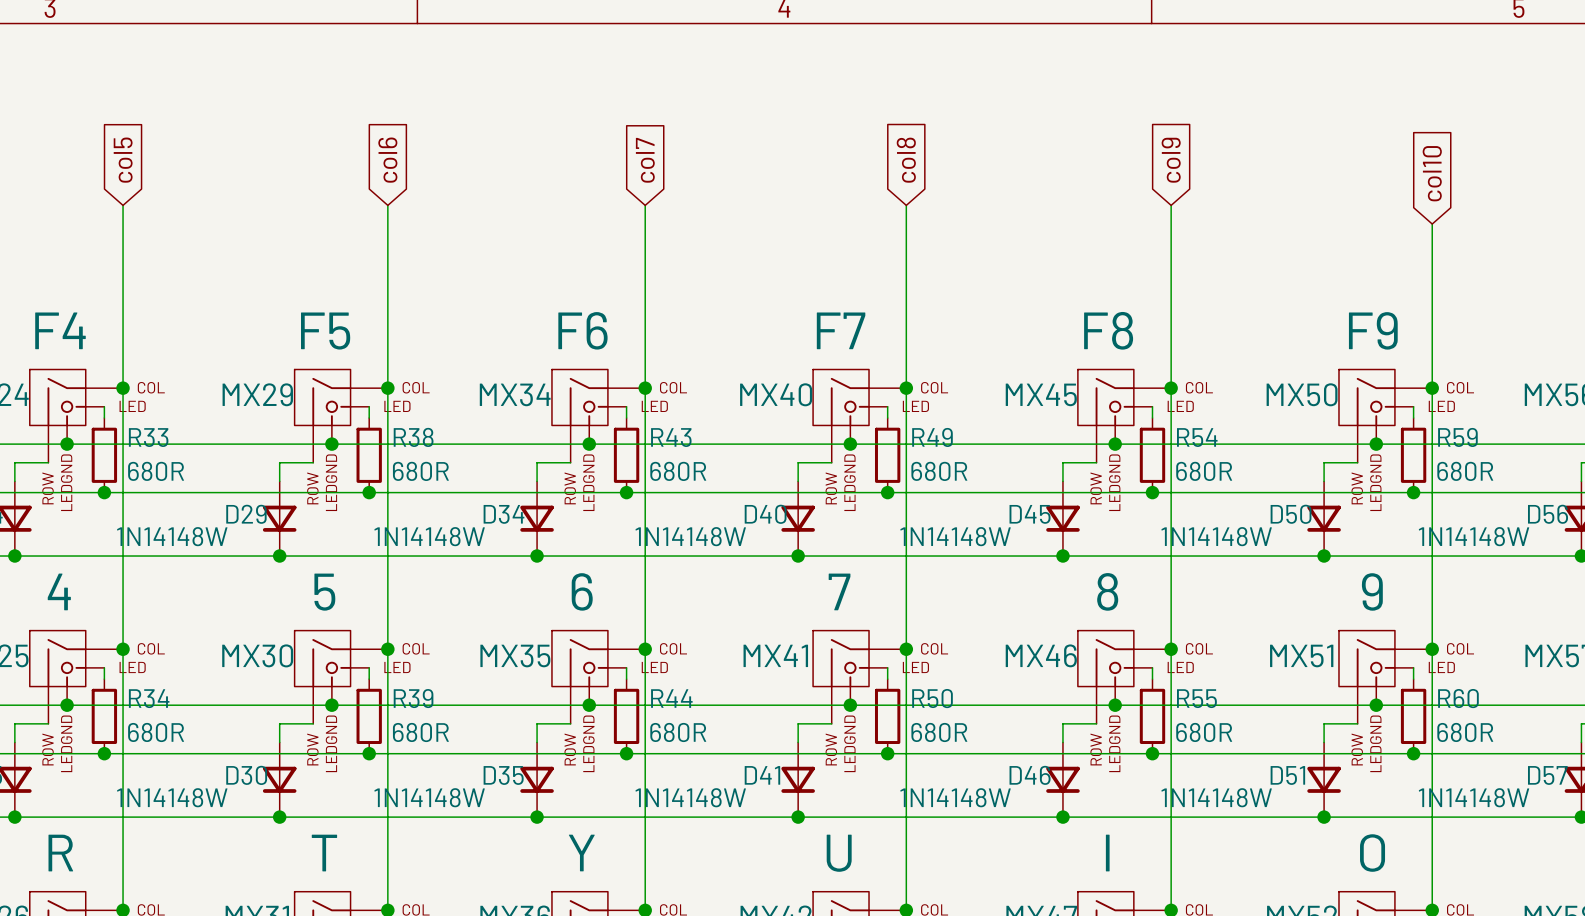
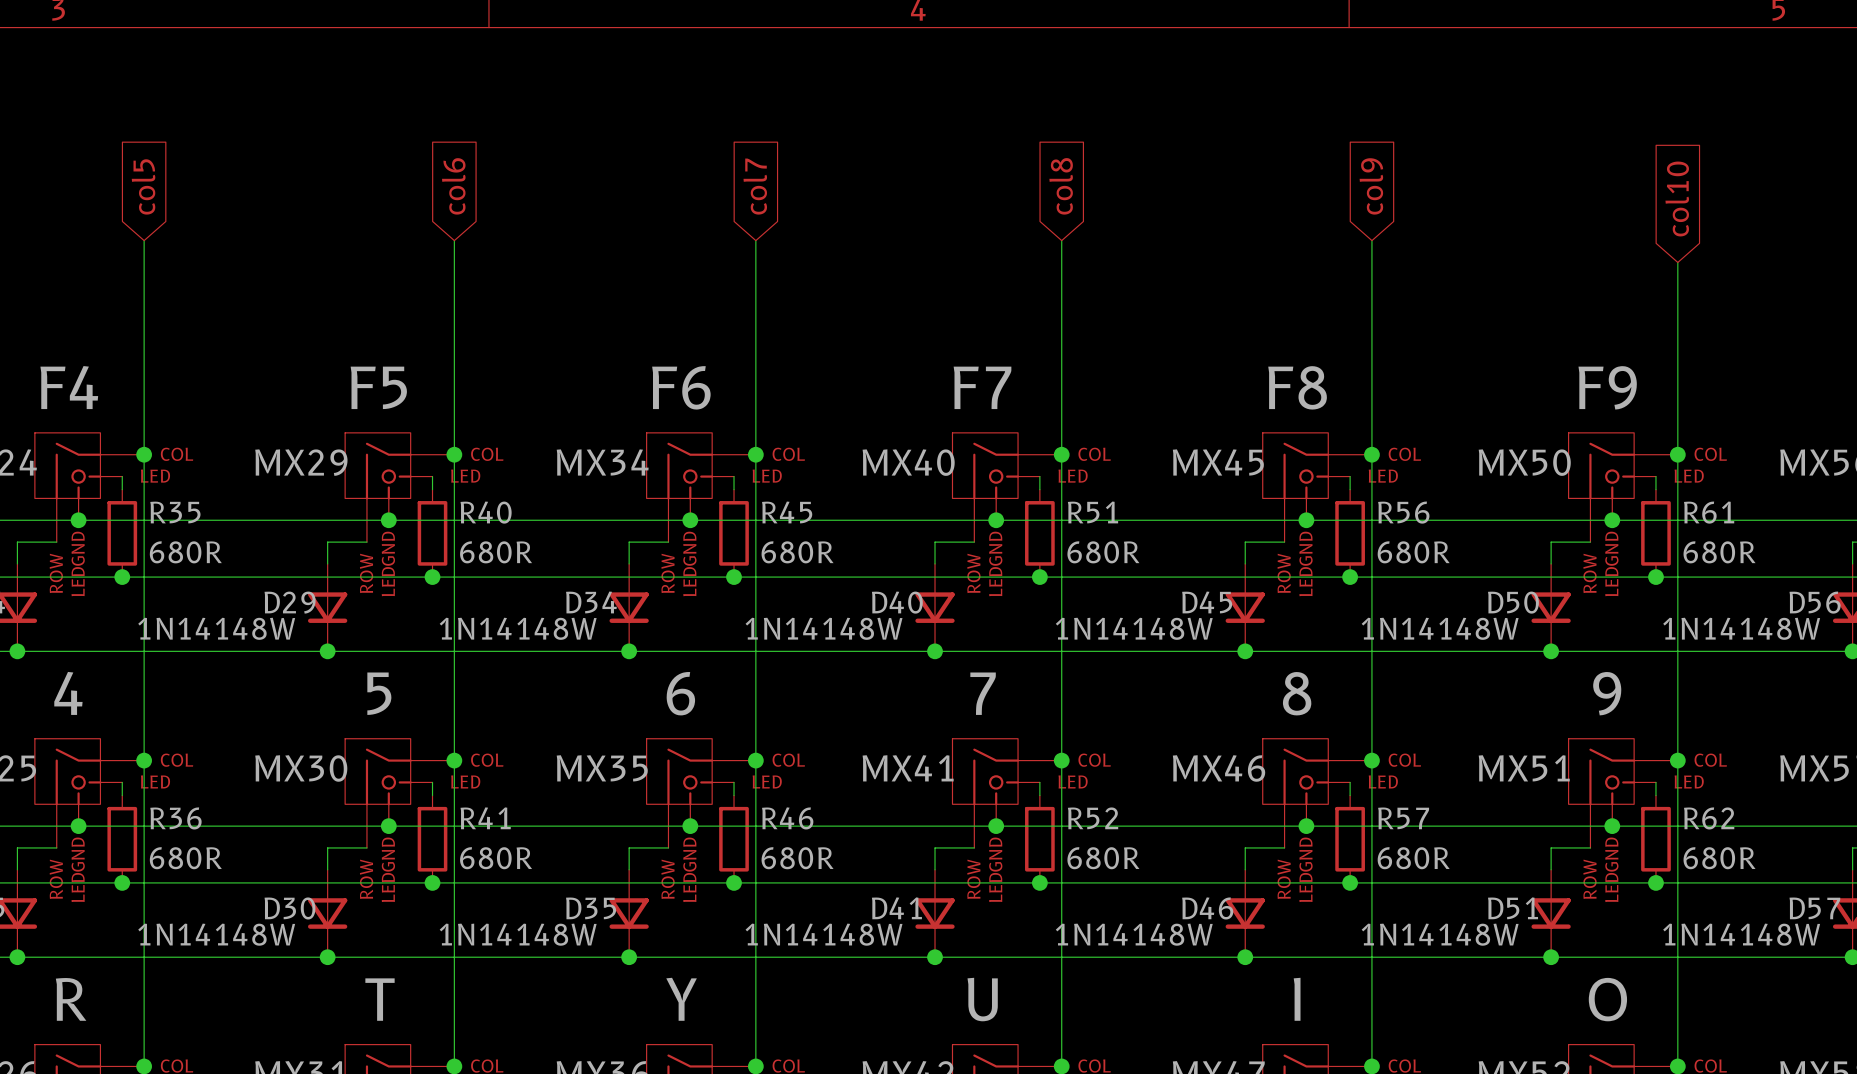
R33 name: R33 (148, 437) -> R35 (175, 512)
R38 name: R38 (413, 437) -> R40 (486, 512)
R43 name: R43 (671, 437) -> R45 (787, 512)
R49 name: R49 (932, 437) -> R51 (1093, 512)
R54 name: R54 (1197, 437) -> R56 (1403, 512)
R59 name: R59 (1457, 437) -> R61 (1709, 512)
R34 name: R34 (149, 698) -> R36 (175, 818)
R39 name: R39 (413, 698) -> R41 (485, 818)
R44 name: R44 (671, 698) -> R46 (787, 818)
R50 name: R50 (932, 698) -> R52 (1093, 818)
R55 name: R55 (1196, 698) -> R57 (1403, 818)
R60 name: R60 (1458, 698) -> R62 (1709, 818)

